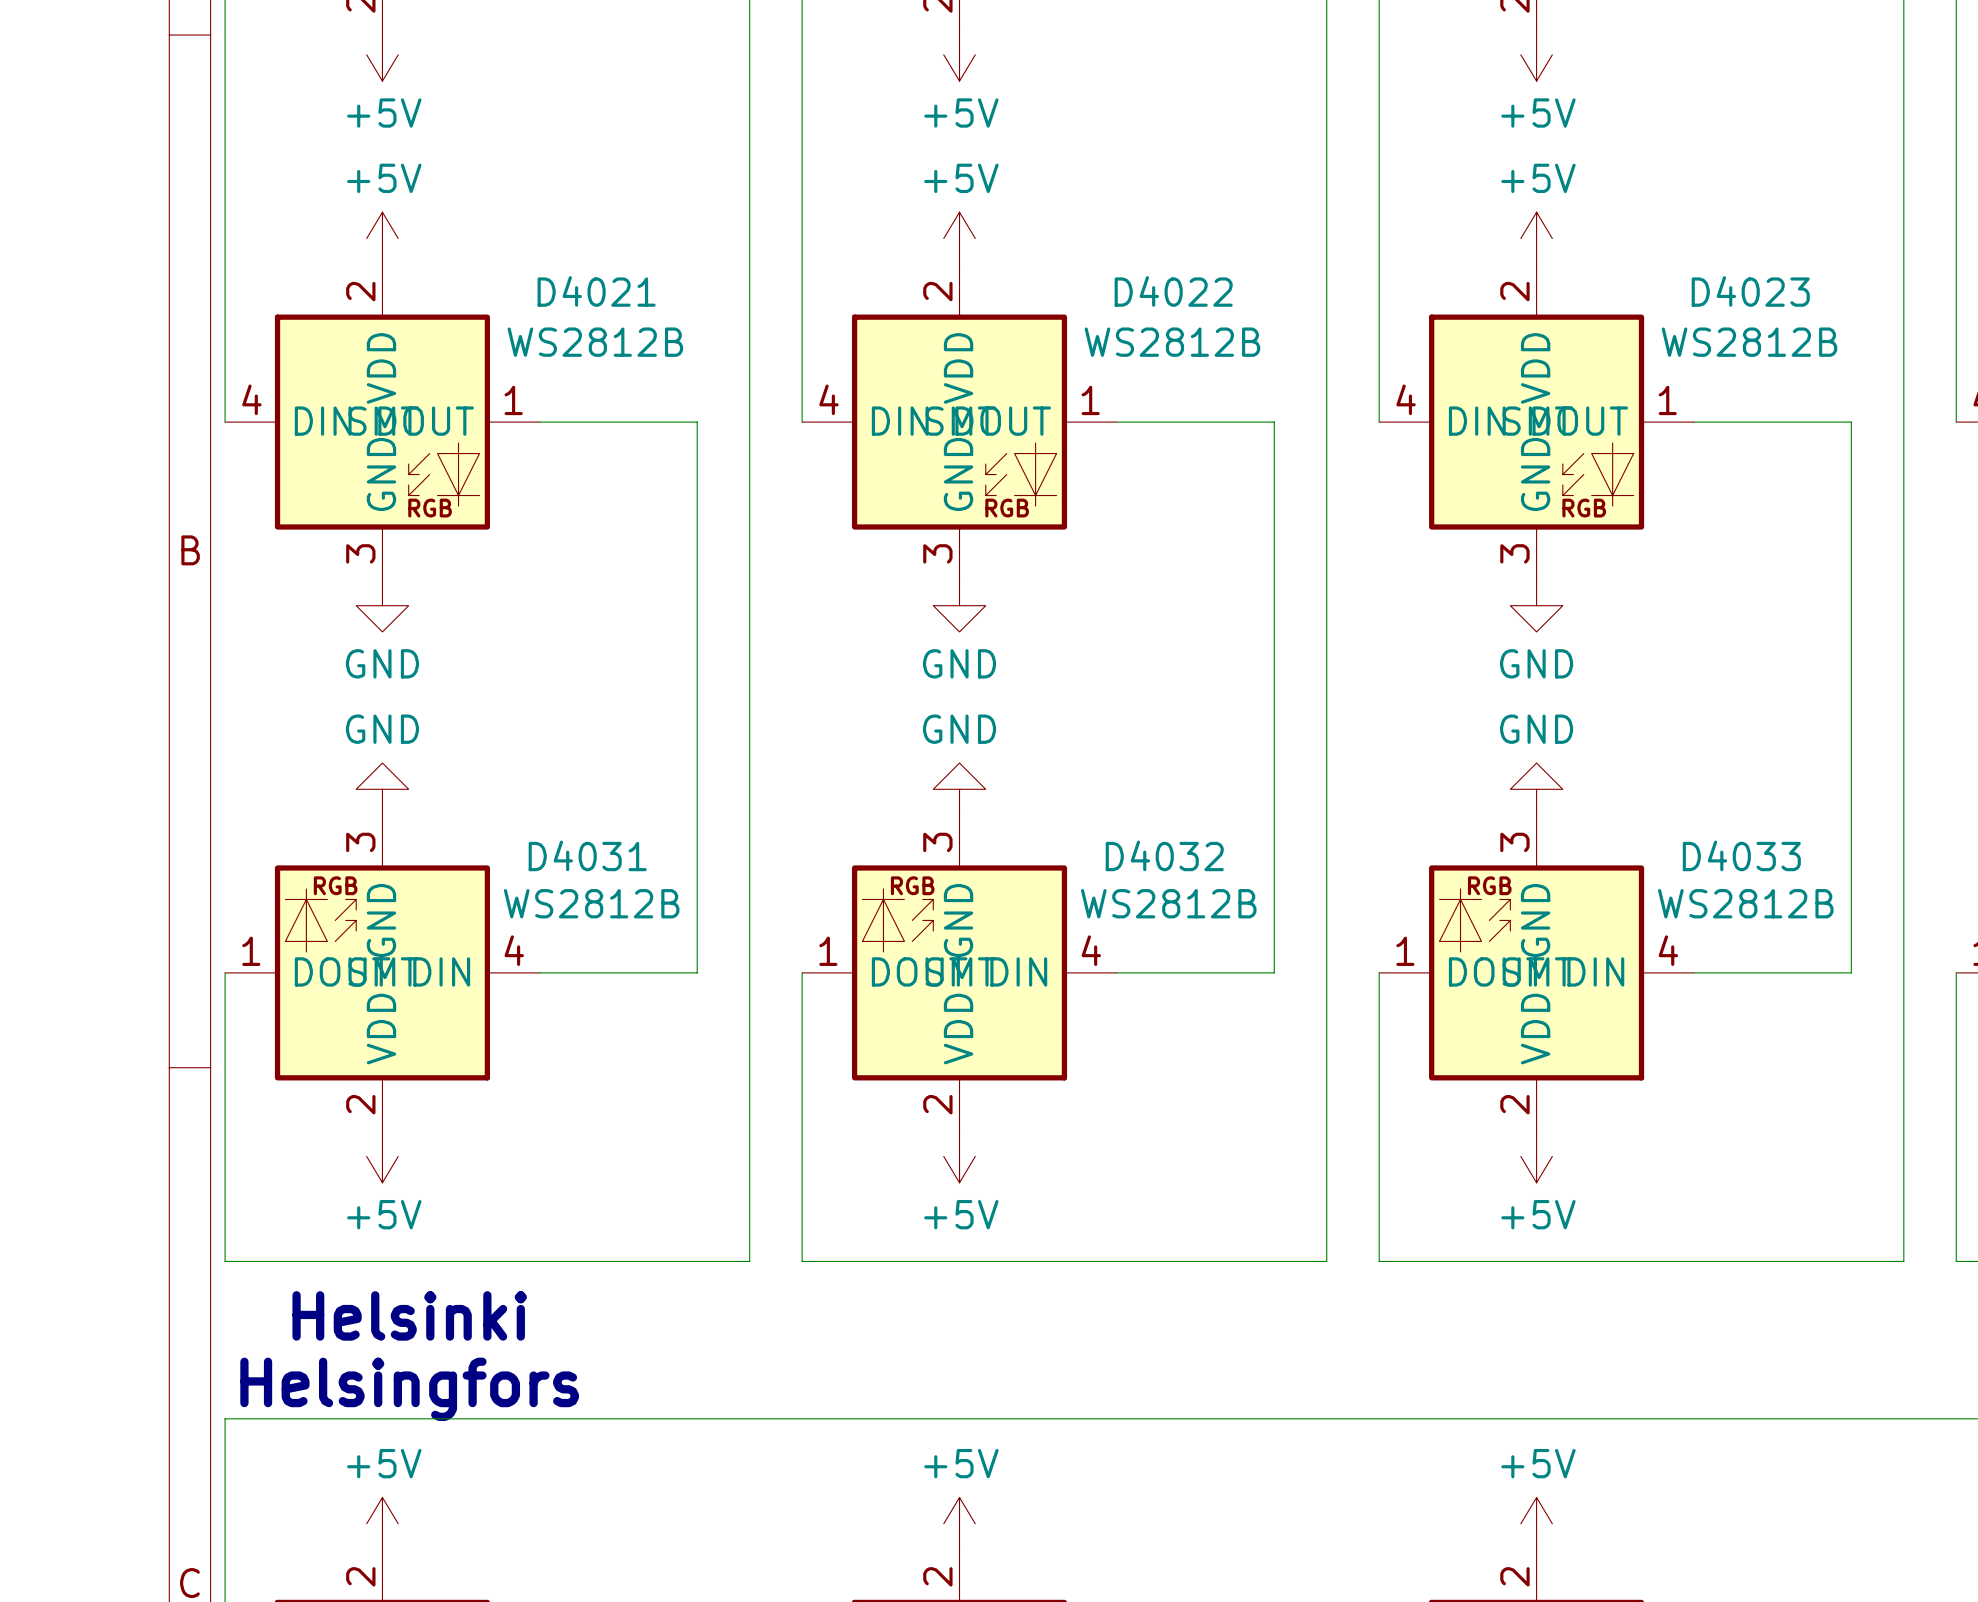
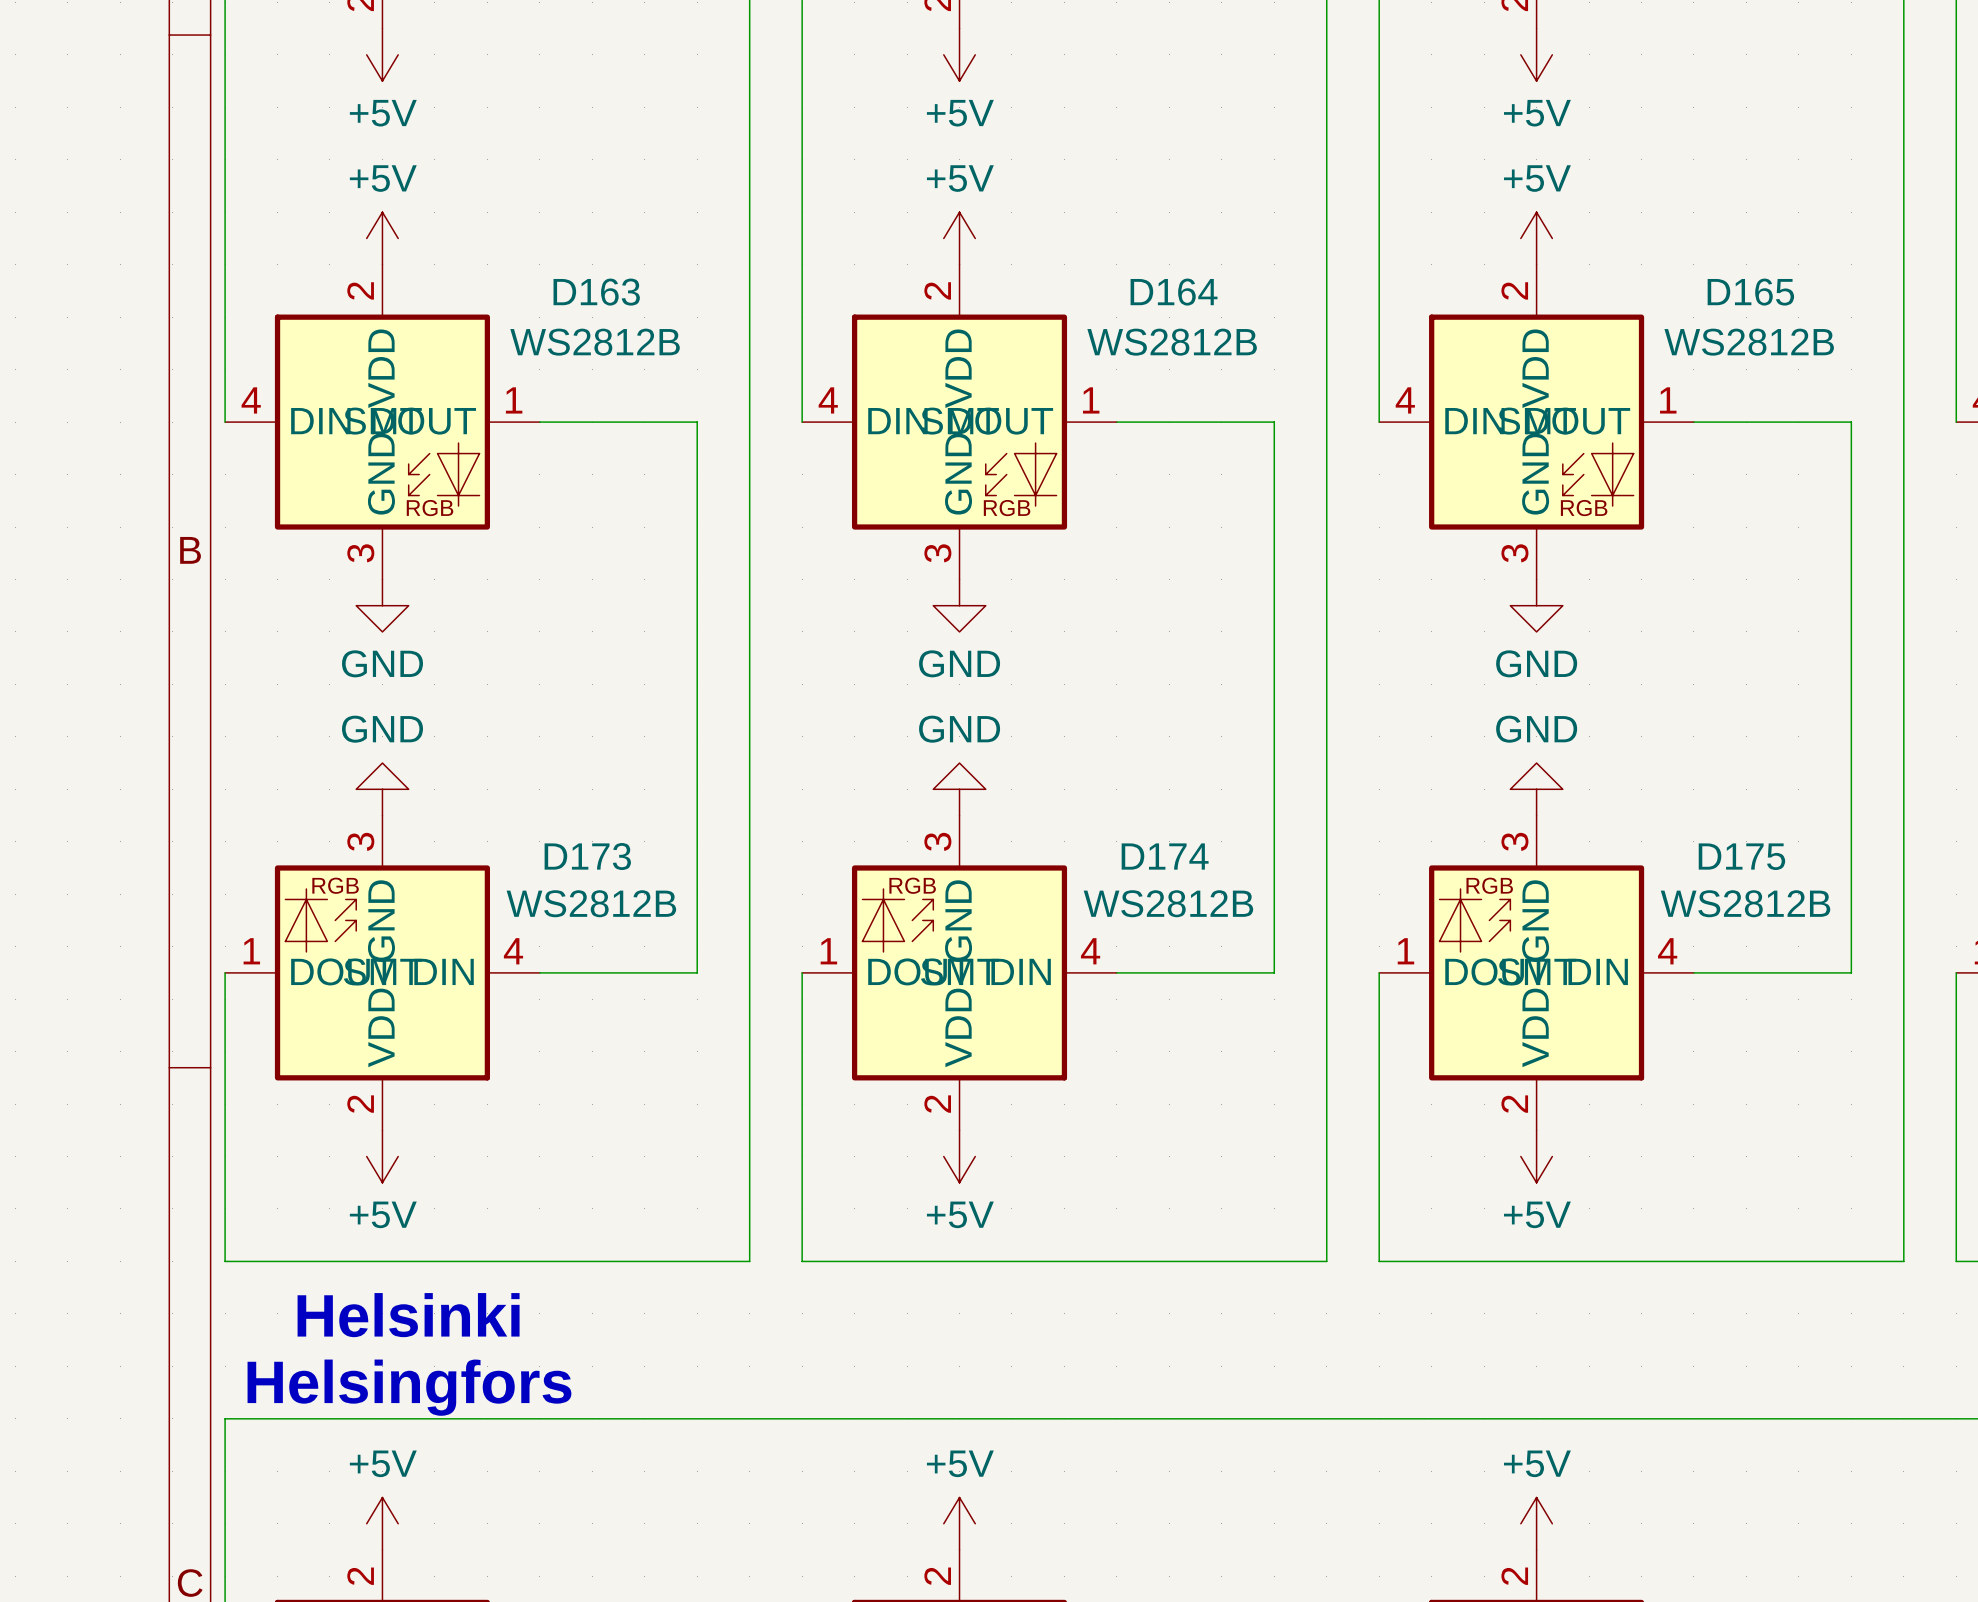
D4021 name: D4021 (596, 291) -> D163 (596, 292)
D4022 name: D4022 (1173, 291) -> D164 (1174, 292)
D4023 name: D4023 (1750, 291) -> D165 (1750, 292)
D4031 name: D4031 (587, 855) -> D173 (587, 856)
D4032 name: D4032 (1164, 855) -> D174 (1165, 856)
D4033 name: D4033 (1741, 855) -> D175 (1741, 856)

